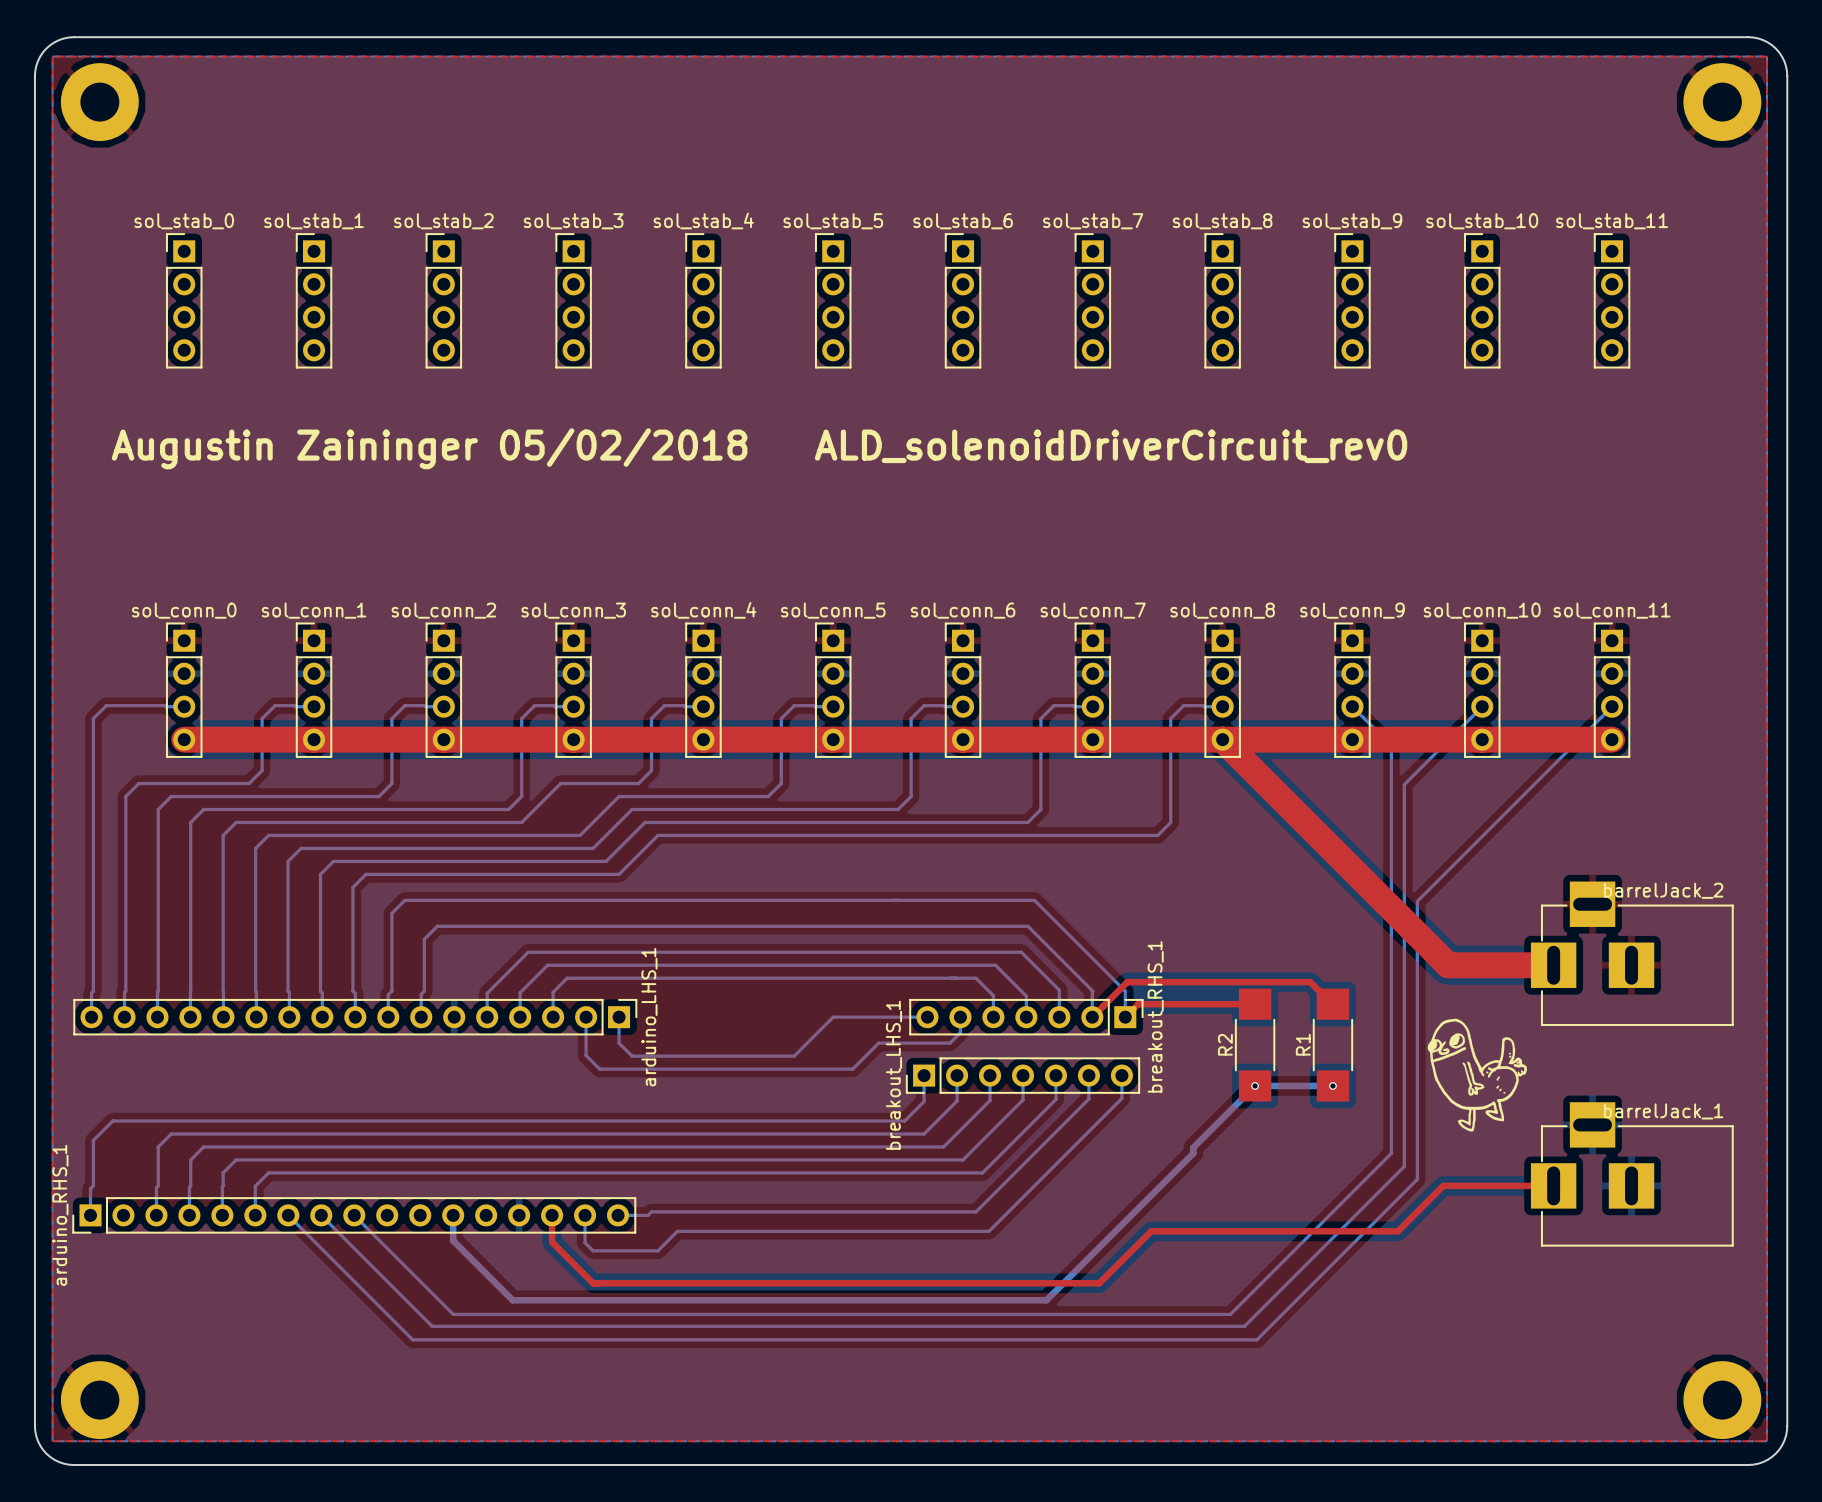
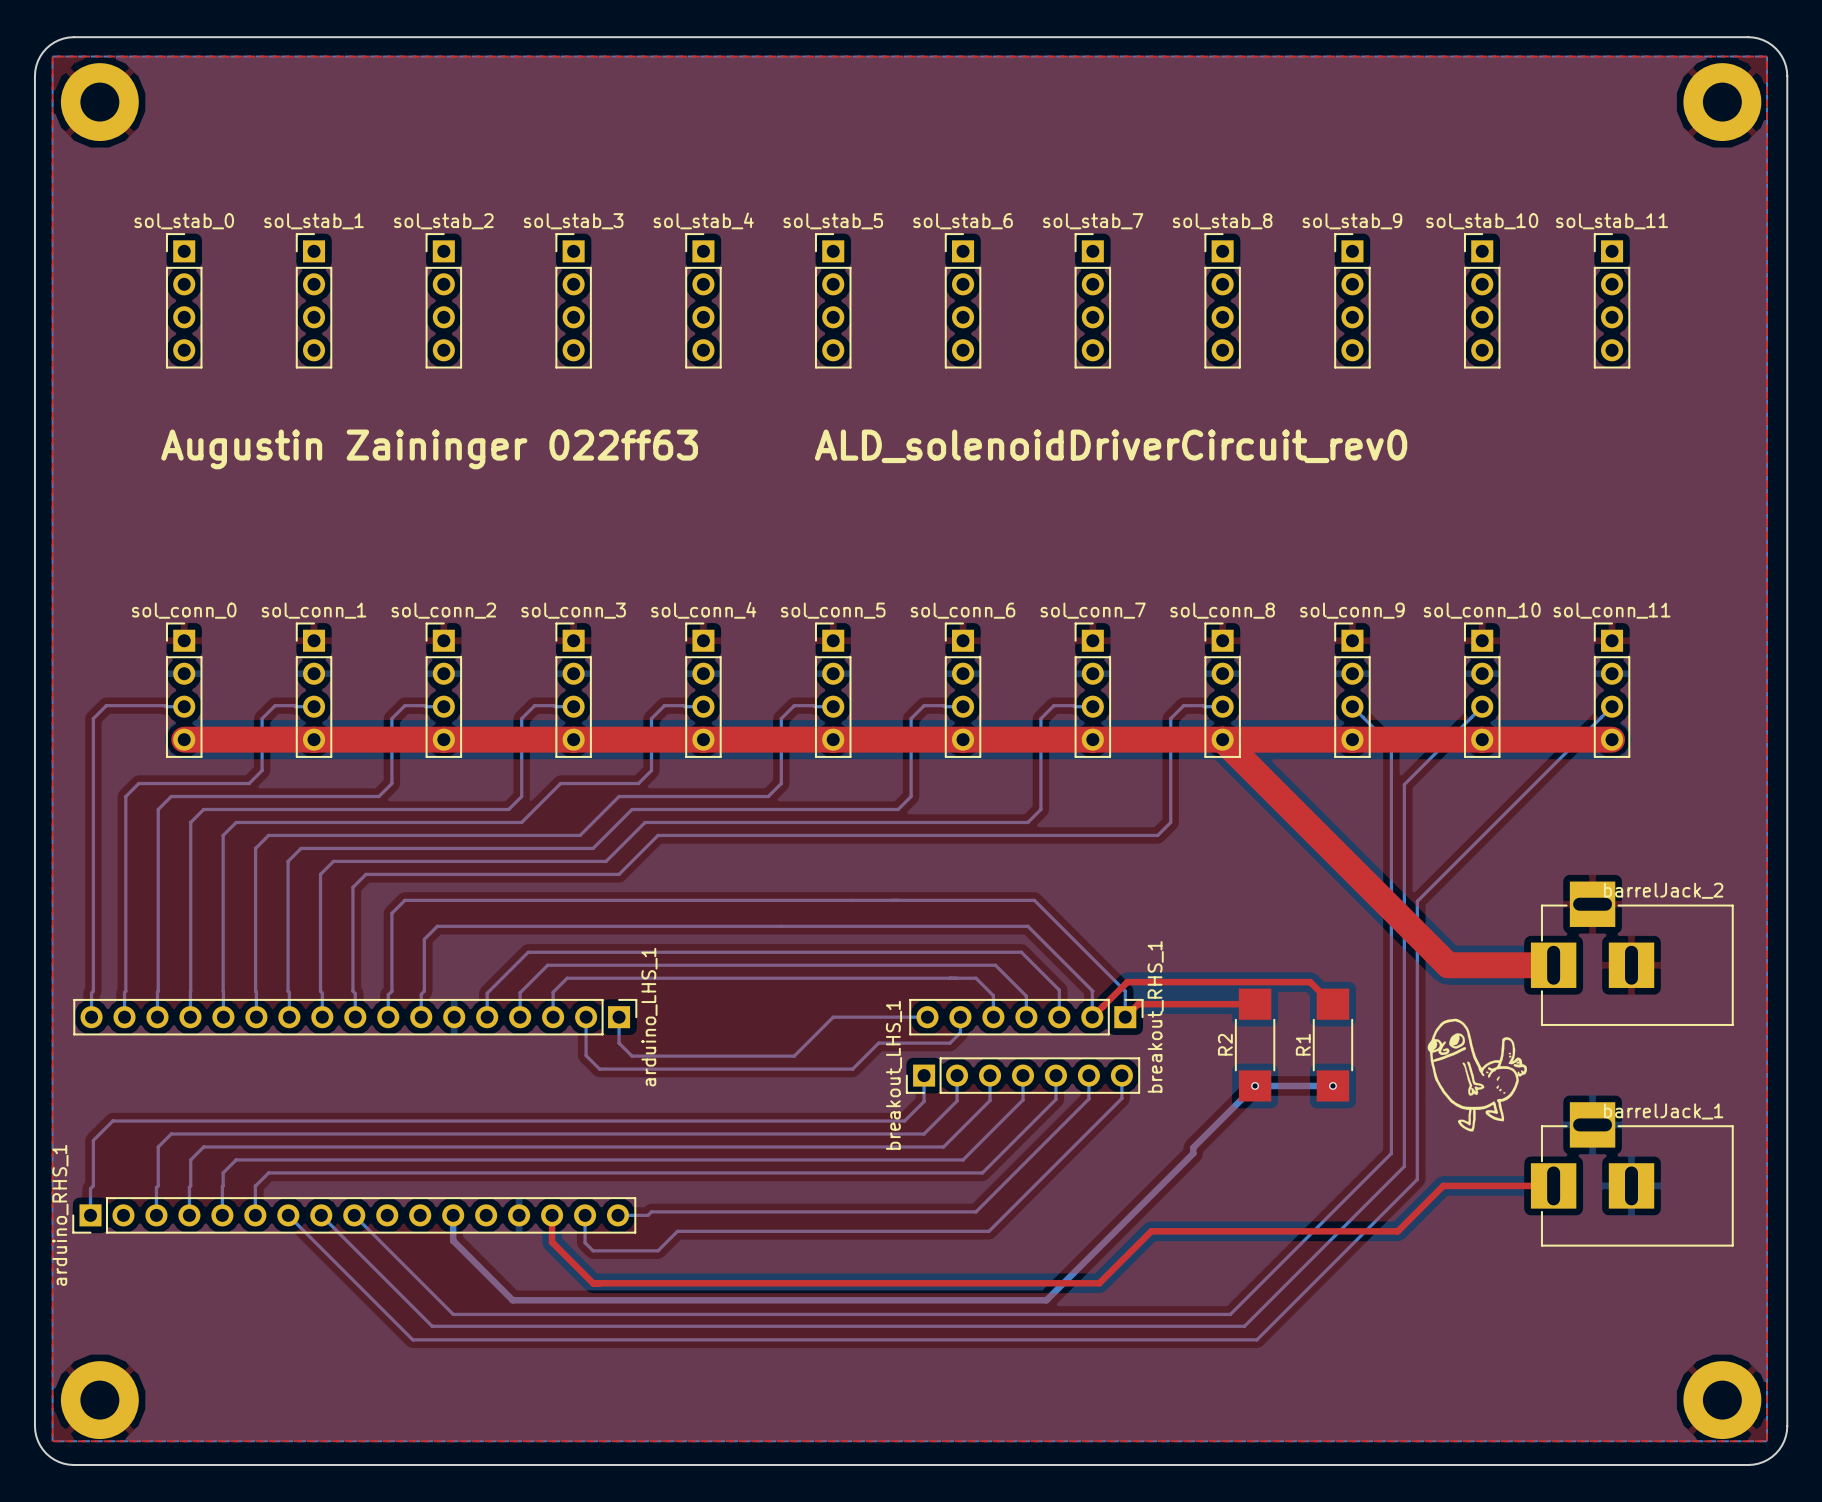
text: Augustin Zaininger 05/02/2018 (429, 448) -> Augustin Zaininger 022ff63 (429, 449)

